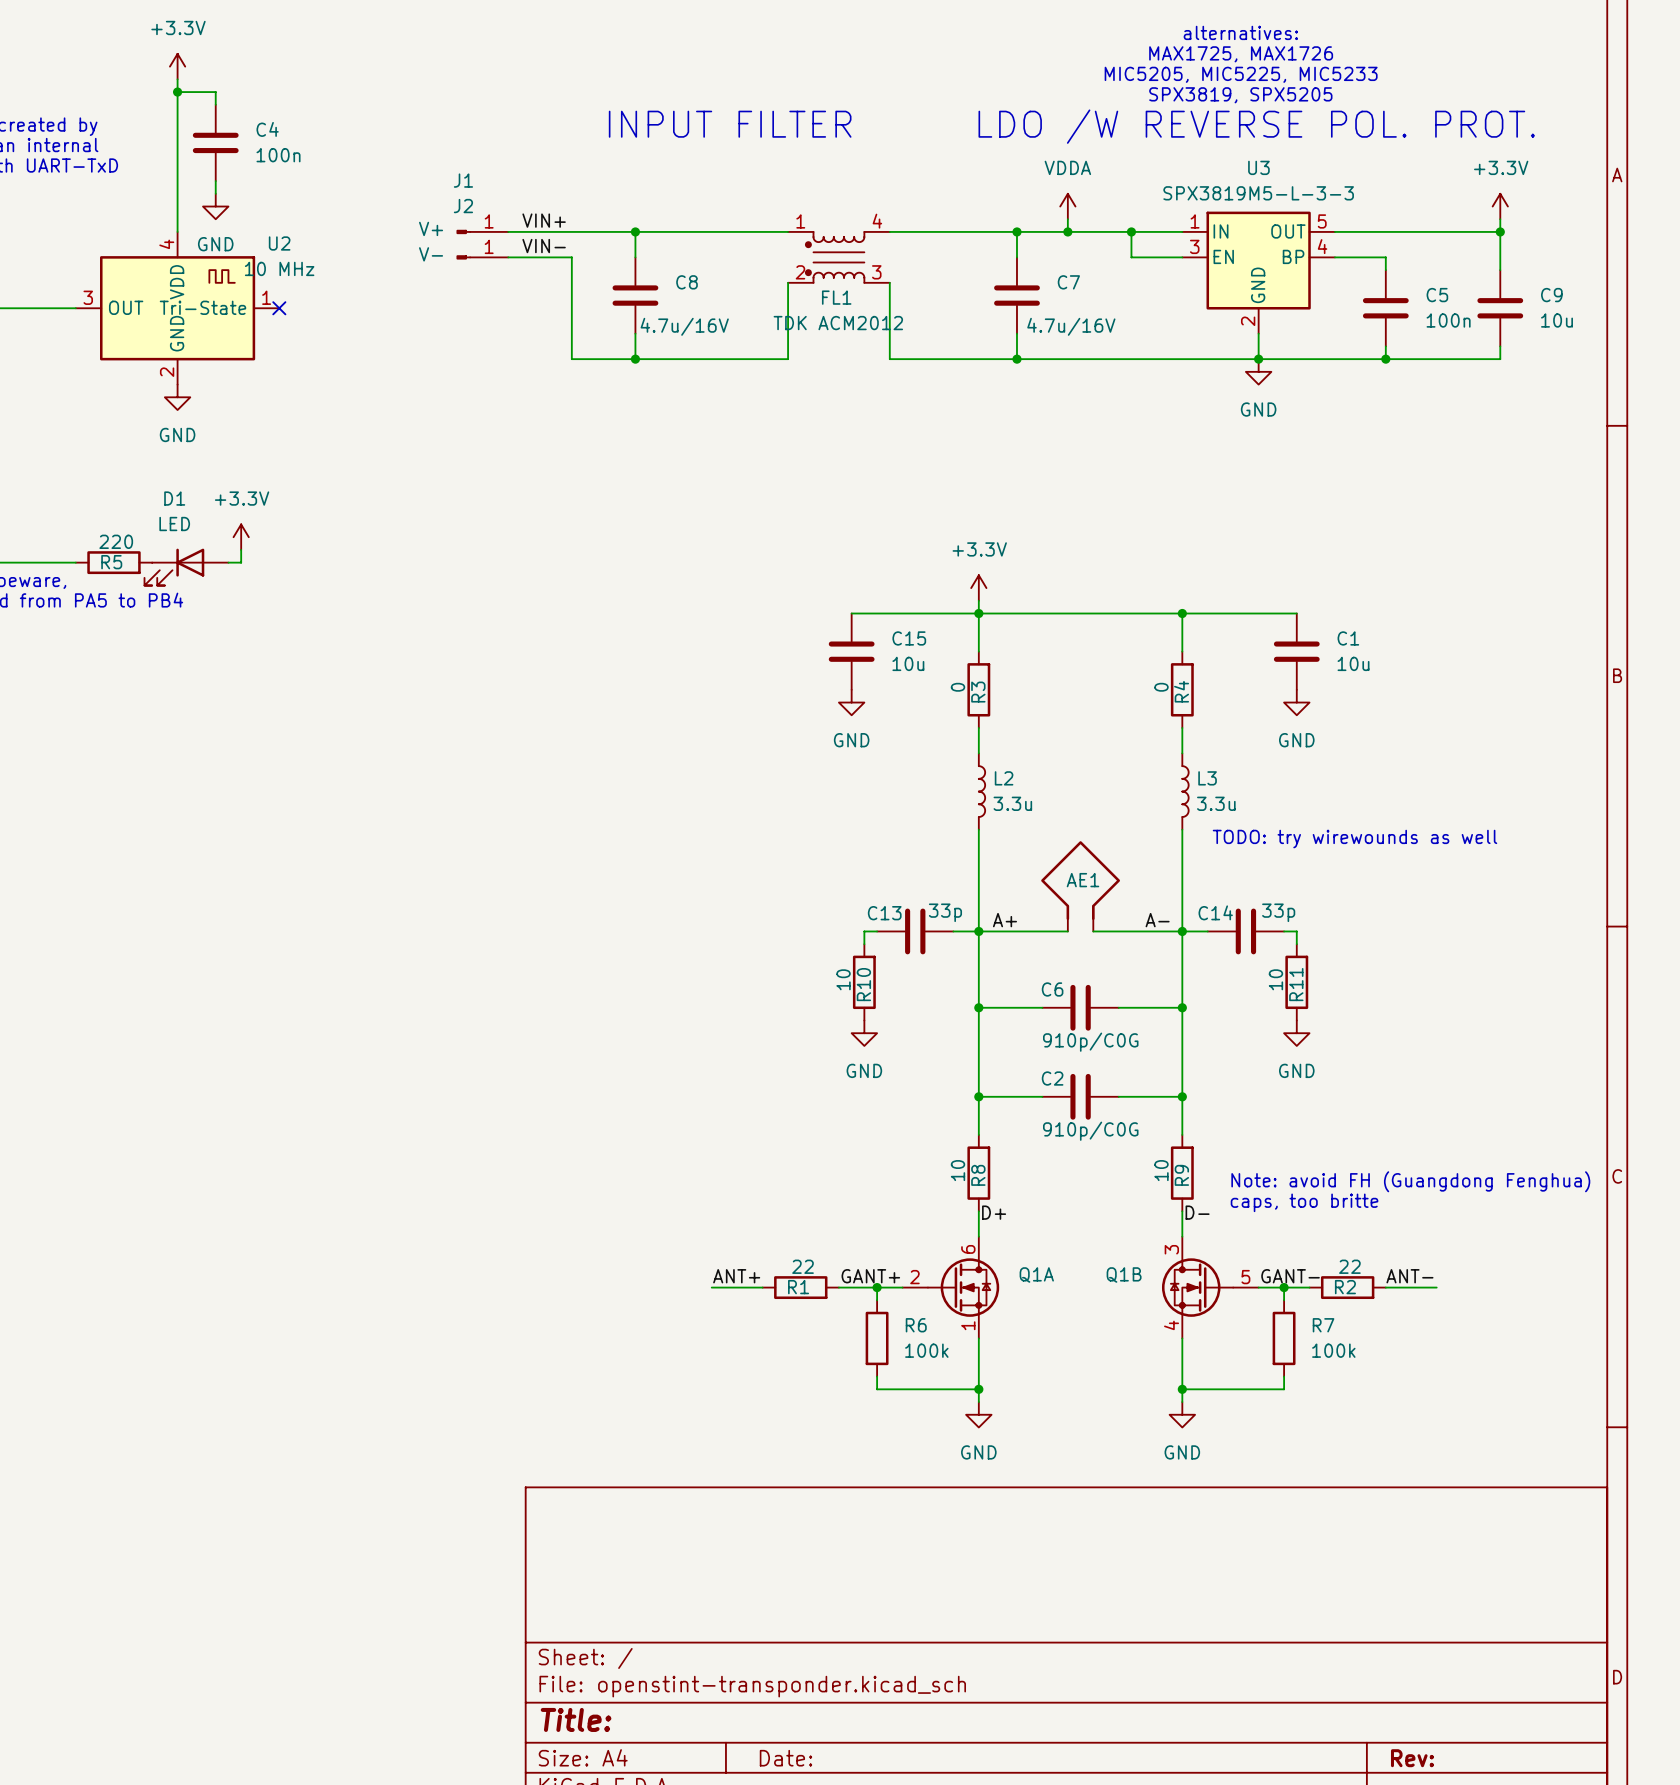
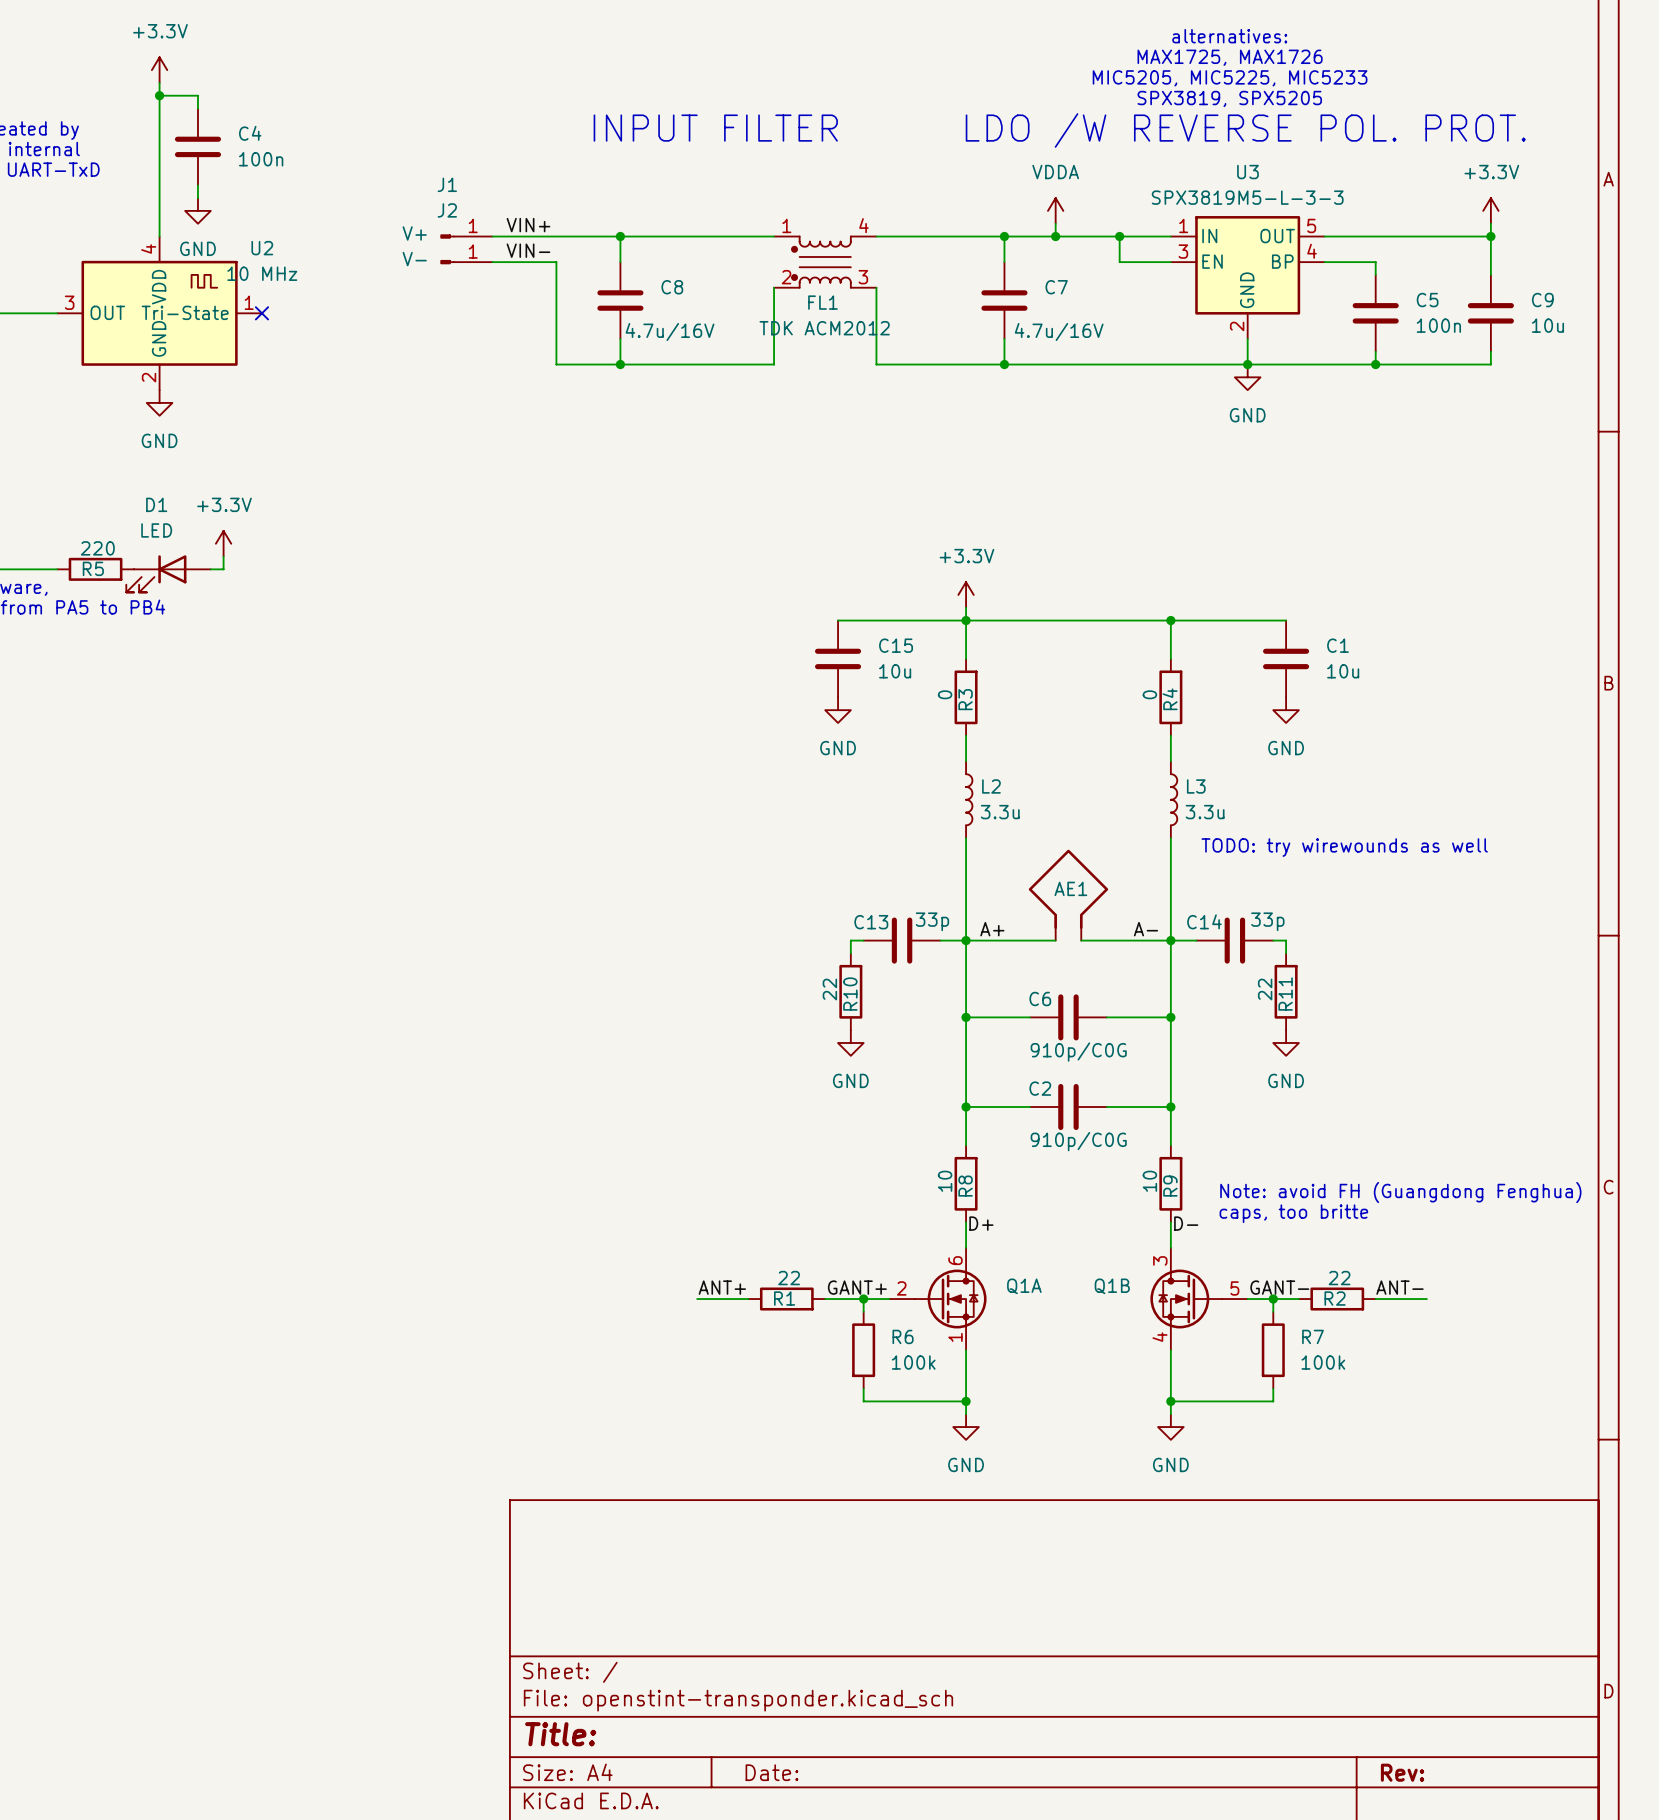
R10 value: 10 (843, 979) -> 22 (829, 989)
R11 value: 10 (1275, 979) -> 22 (1265, 989)

